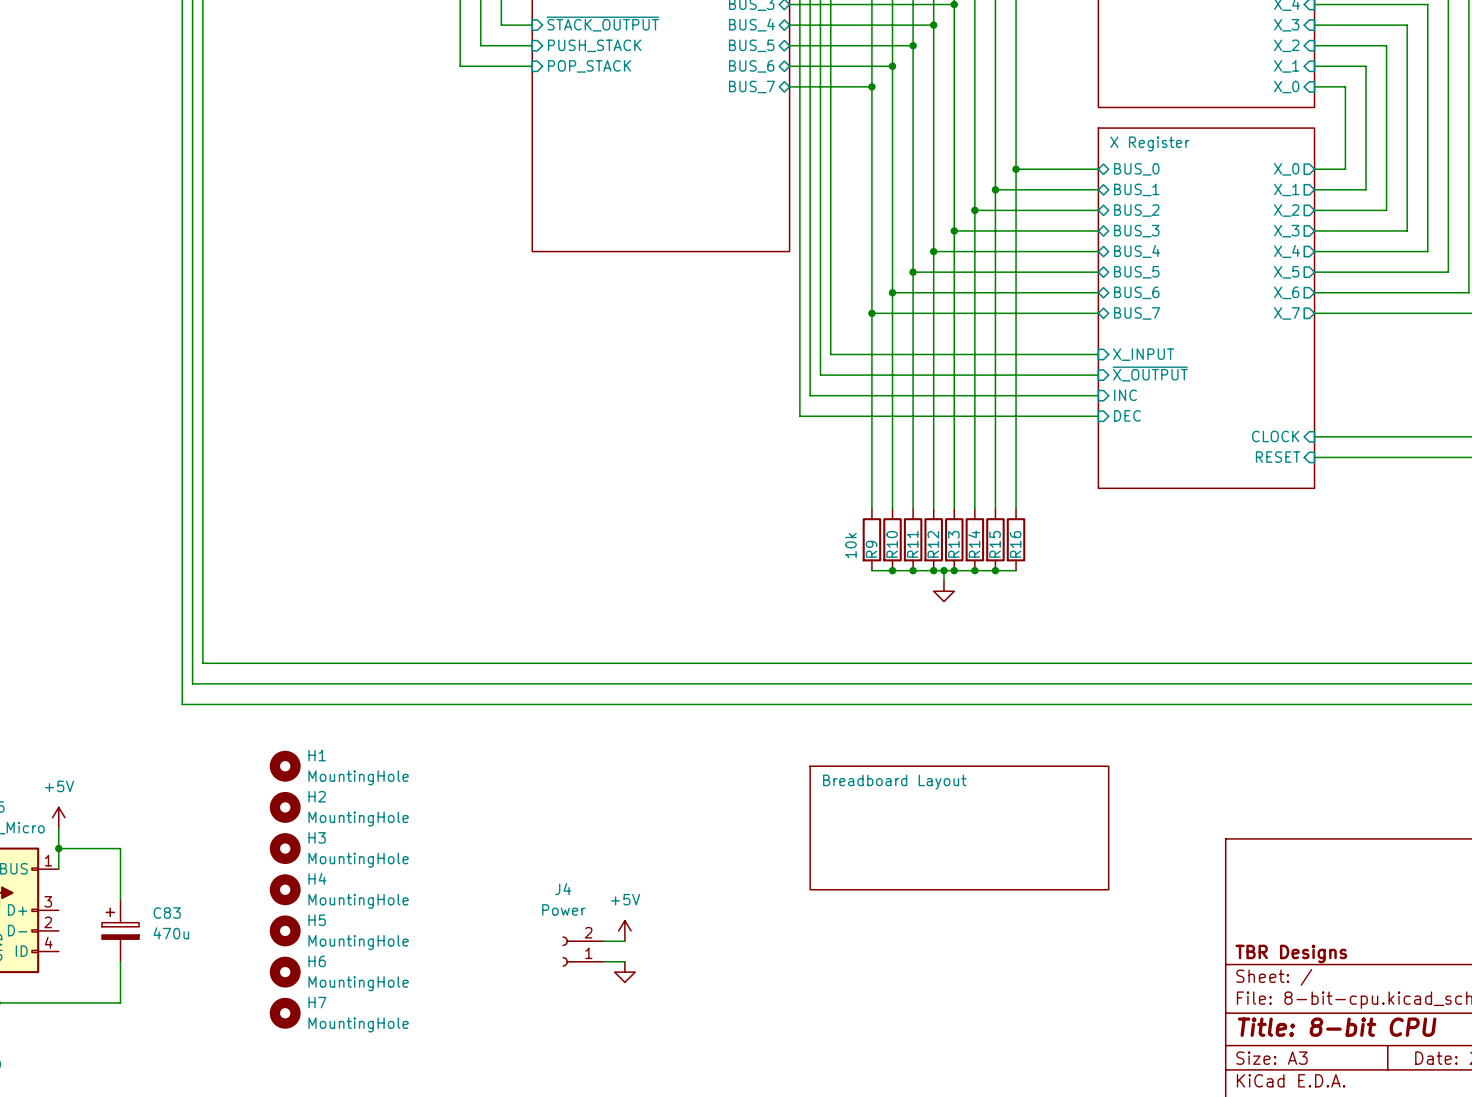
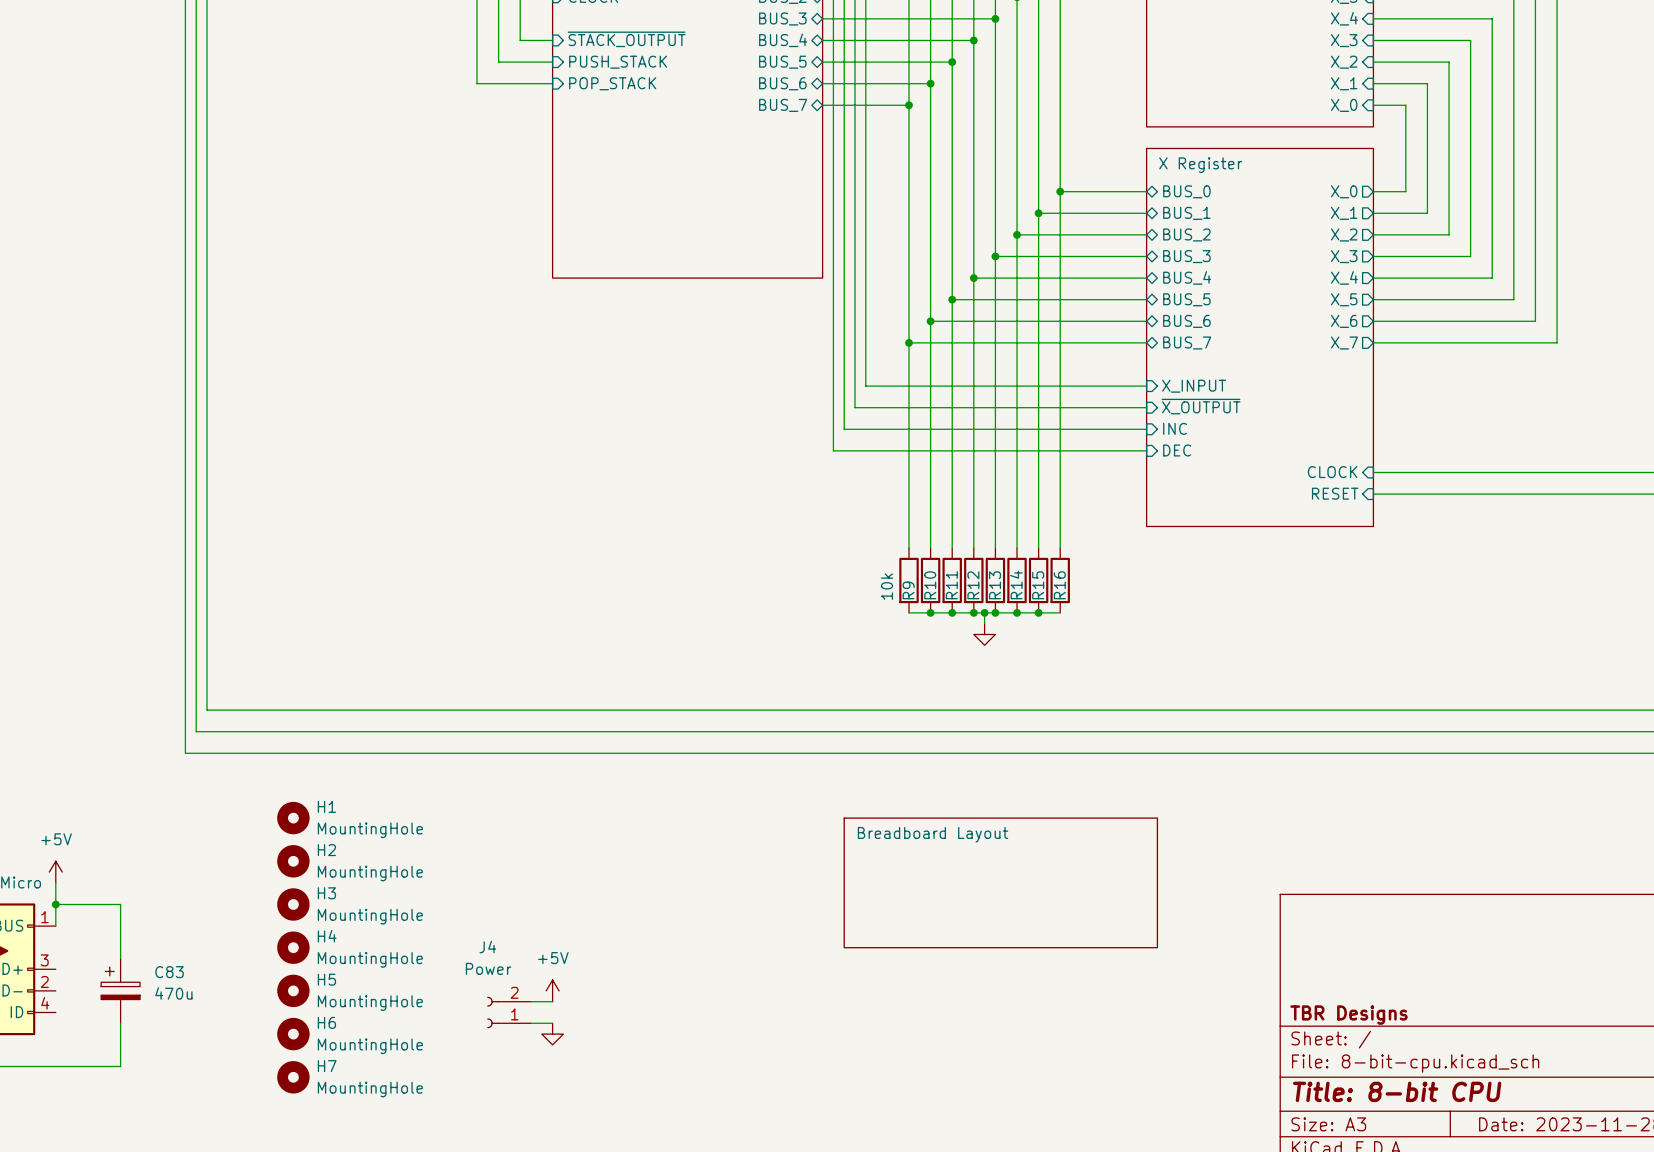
power symbol position: +5V (624, 930) -> +5V (552, 990)
wire: (604, 941) (624, 941) -> (531, 1001) (552, 1001)
J4 position: (583, 951) -> (509, 1012)
wire: (604, 961) (624, 961) -> (531, 1023) (552, 1023)
power symbol position: (624, 972) -> (552, 1034)

